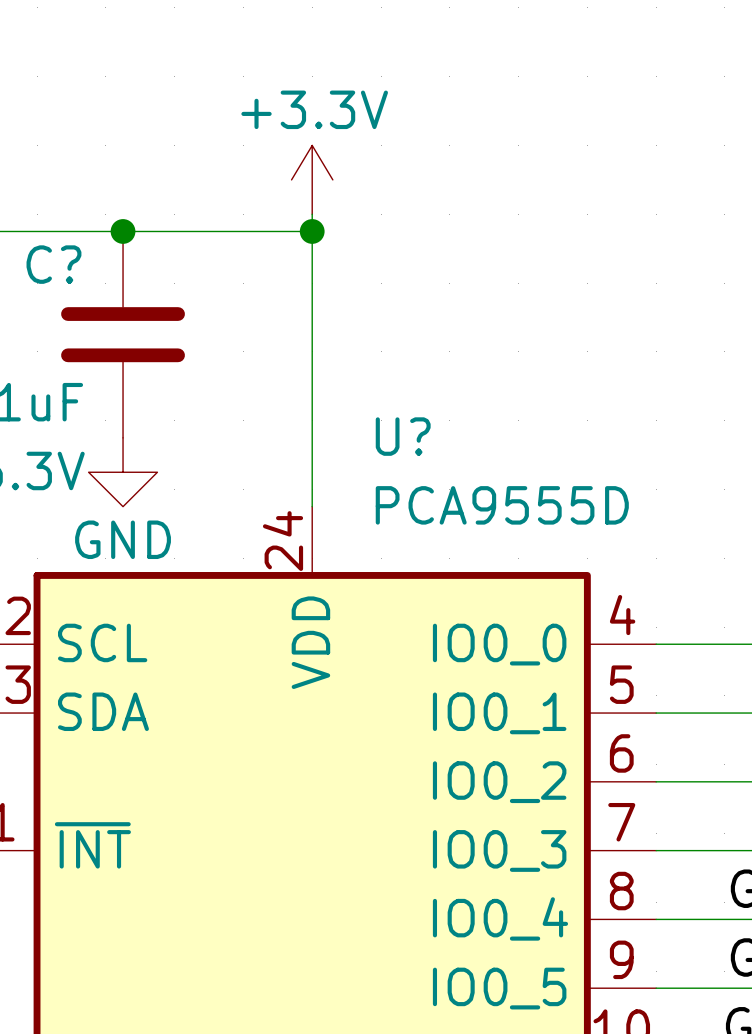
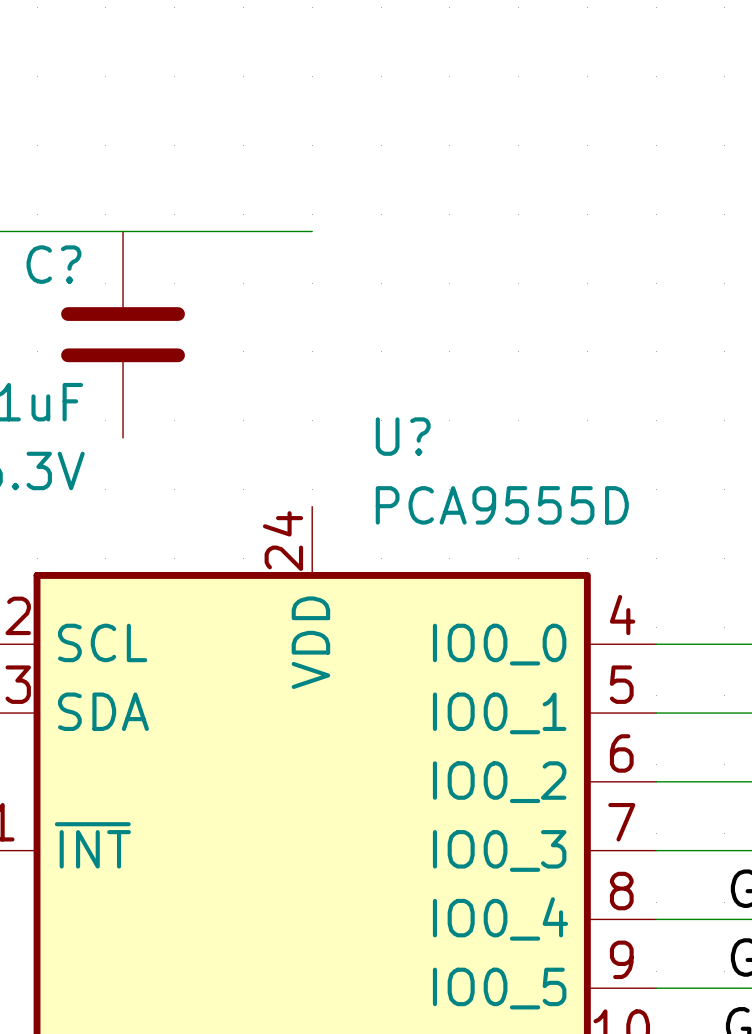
power symbol: +3.3V (312, 179) -> none
wire: (312, 214) (312, 506) -> none
junction: (123, 231) -> none
junction: (312, 231) -> none
power symbol: GND (123, 472) -> none

